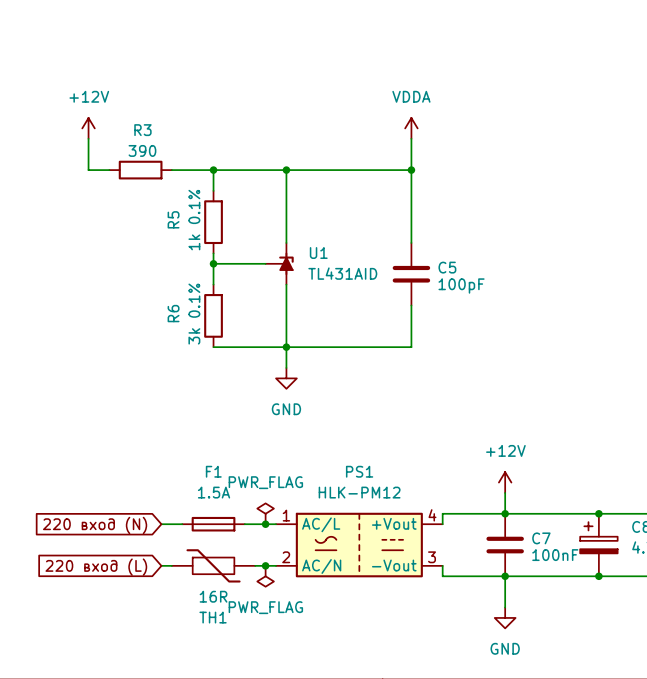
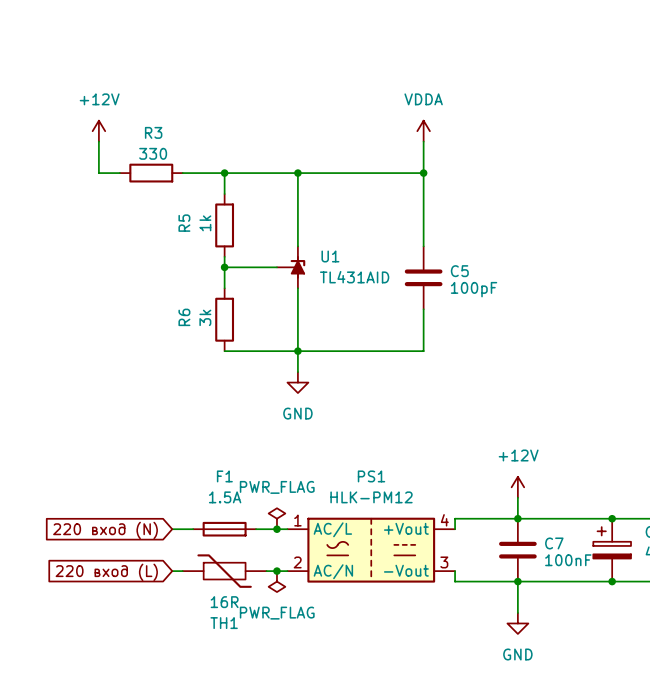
R3 value: 390 (142, 150) -> 330 (153, 153)
R5 value: 1k 0.1% (194, 220) -> 1k (205, 223)
R6 value: 3k 0.1% (194, 314) -> 3k (205, 317)

